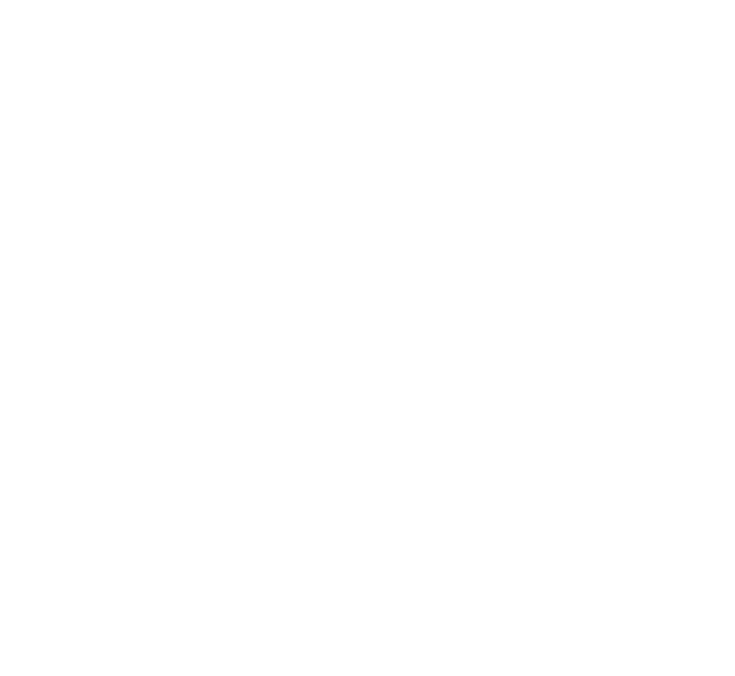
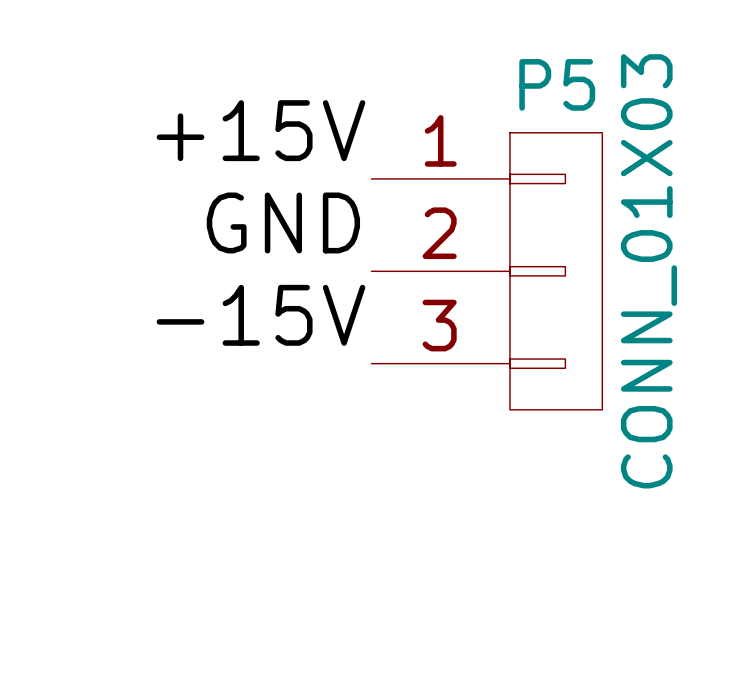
label: none -> +15V (260, 130)
label: none -> GND (283, 222)
P5: none -> CONN_01X03 (486, 271)
label: none -> -15V (260, 315)

